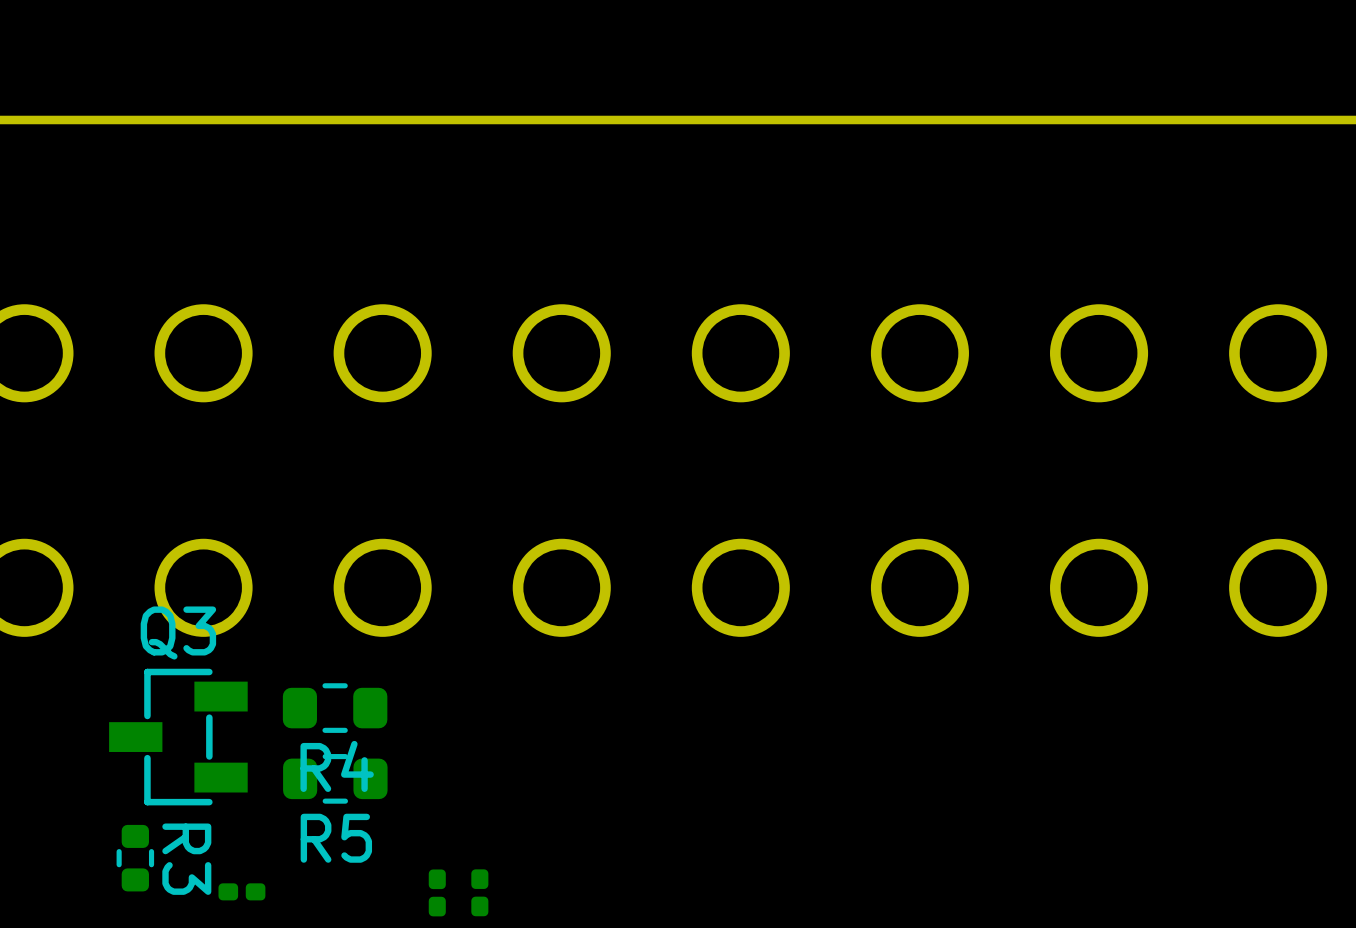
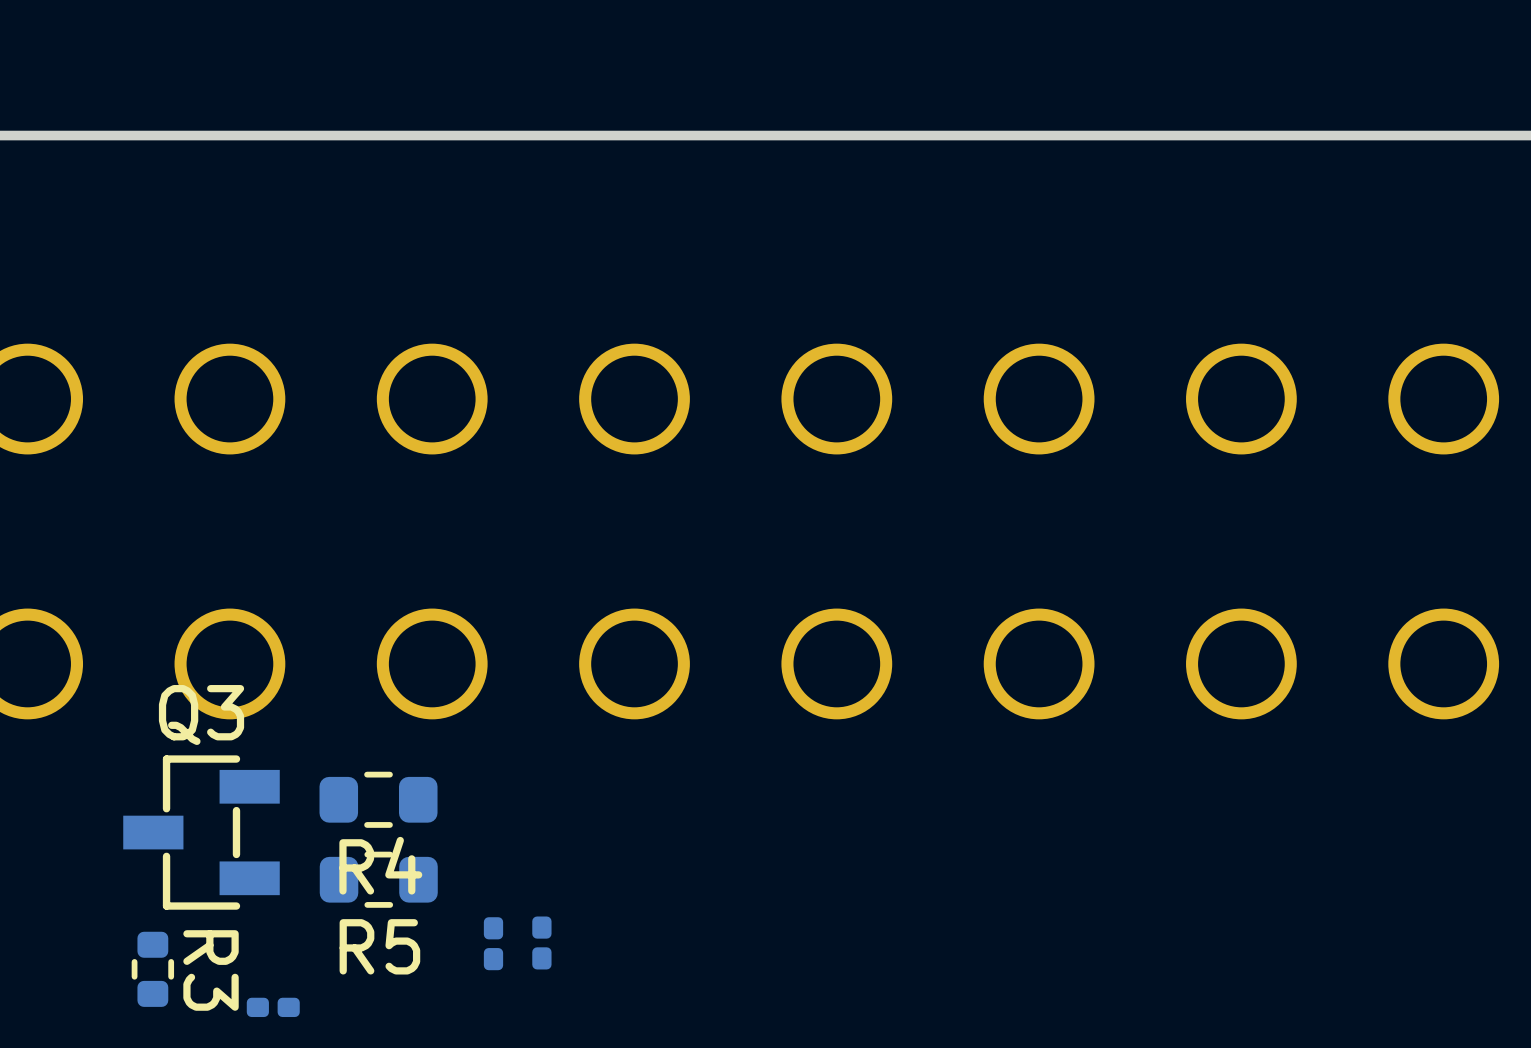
part: none -> (541, 942)
part: none -> (493, 943)
part: (437, 892) -> none
part: (479, 892) -> none

